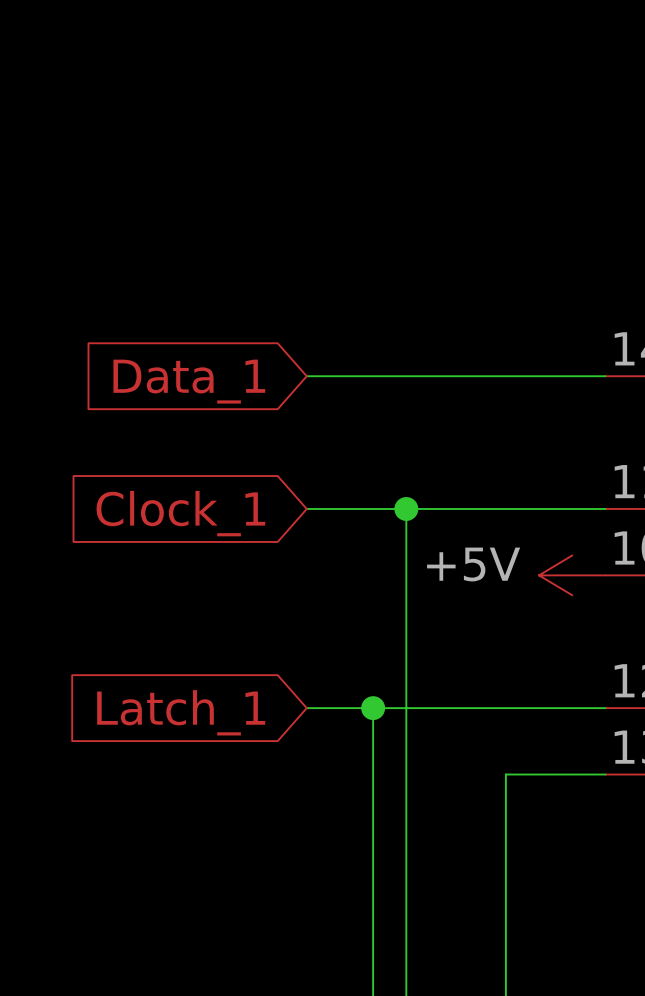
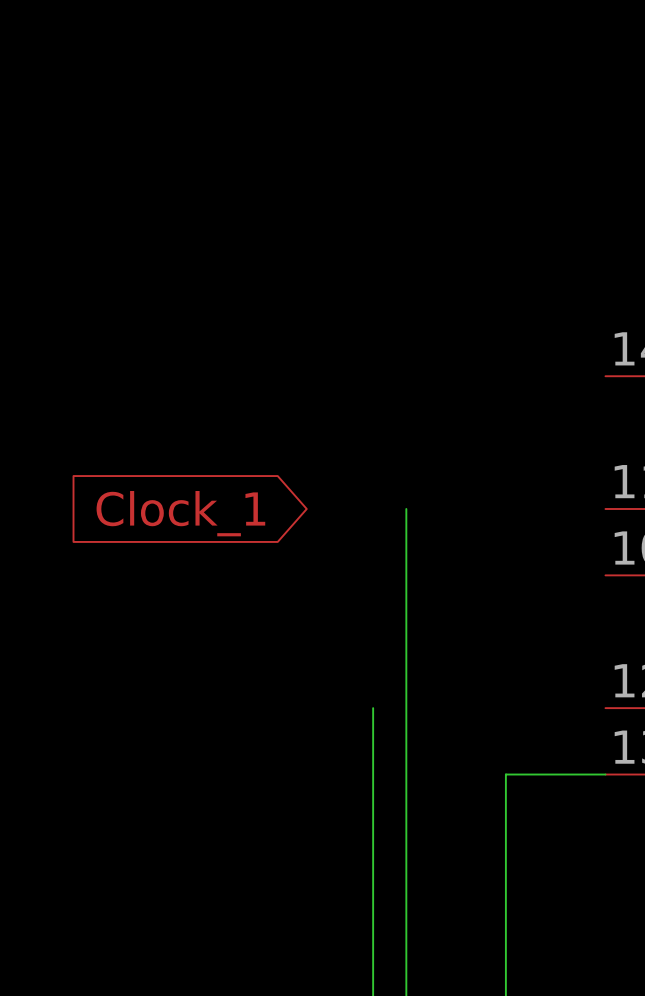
wire: (306, 376) (605, 376) -> none
global label: Data_1 (189, 381) -> none
wire: (306, 508) (605, 508) -> none
junction: (406, 508) -> none
power symbol: +5V (572, 575) -> none
wire: (306, 708) (605, 708) -> none
junction: (373, 708) -> none
global label: Latch_1 (181, 712) -> none

